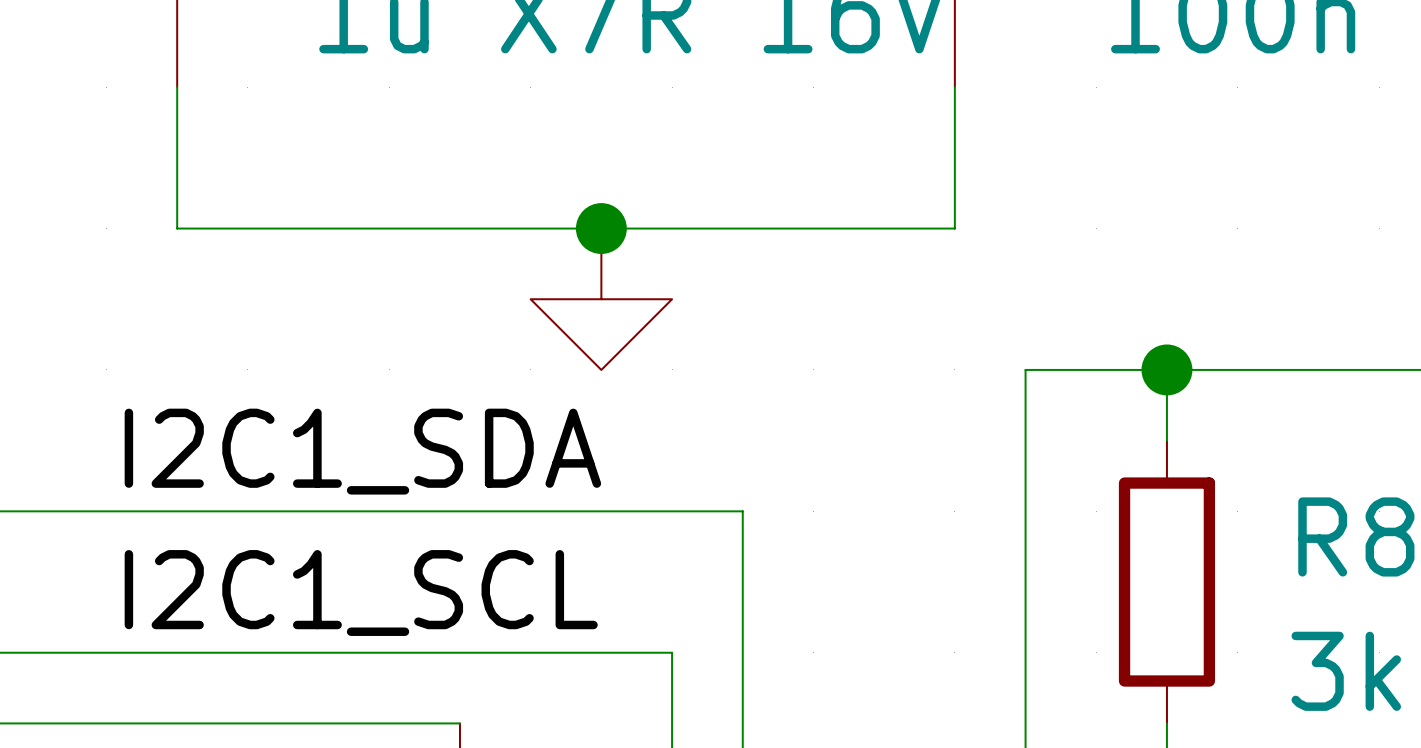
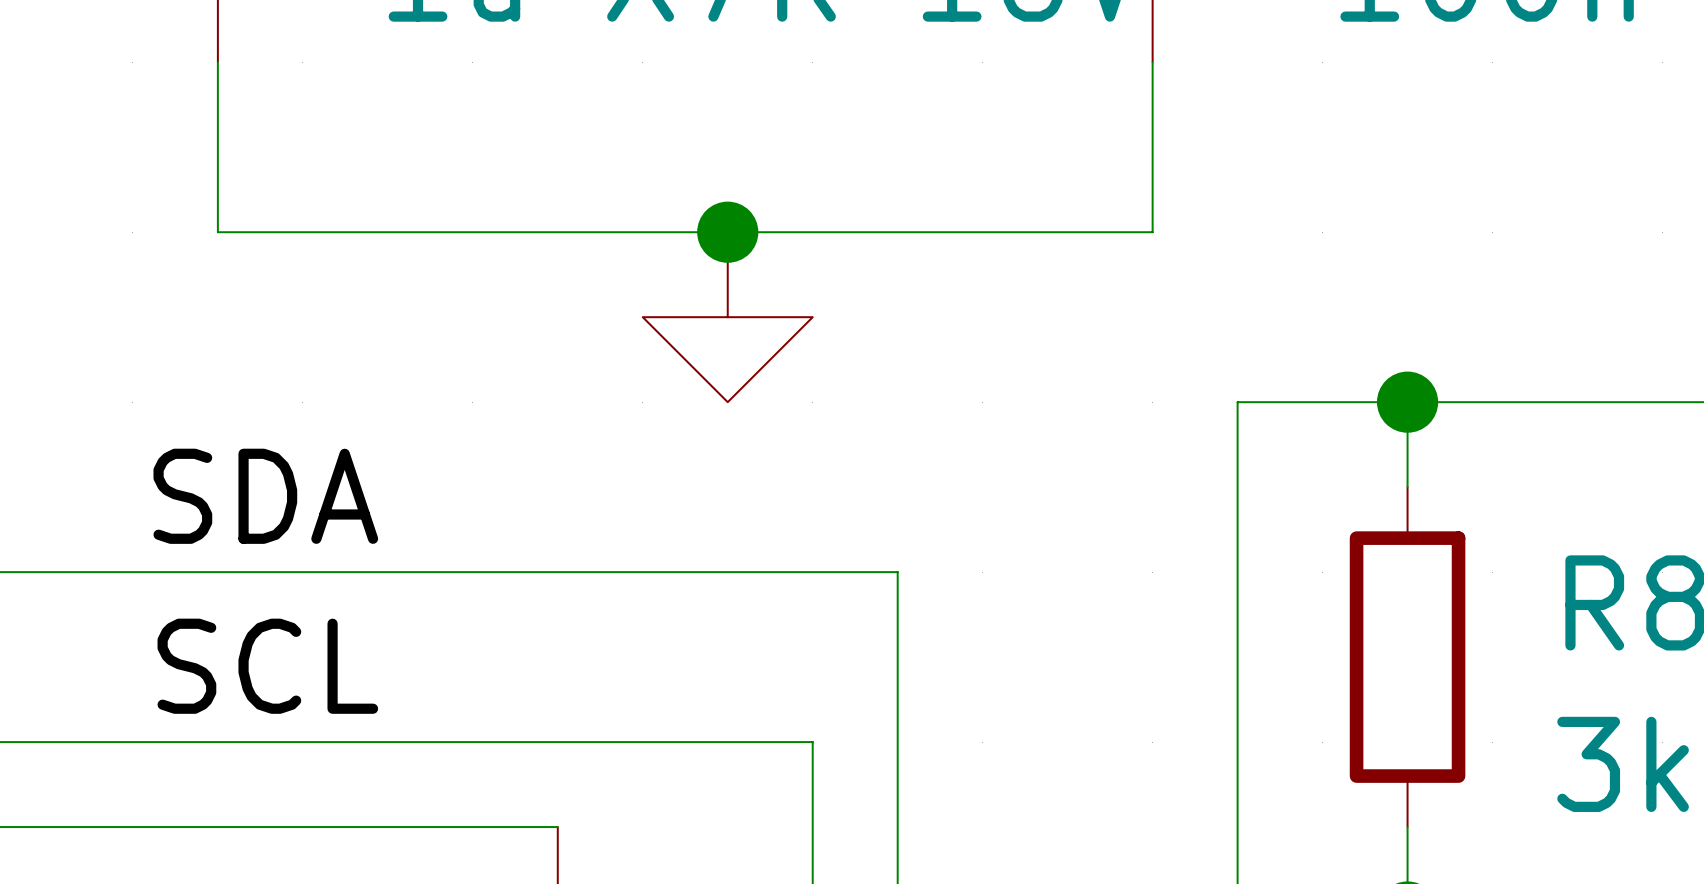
label: none -> SDA (265, 496)
label: I2C1_SDA (362, 451) -> none
label: none -> SCL (267, 666)
label: I2C1_SCL (361, 593) -> none

